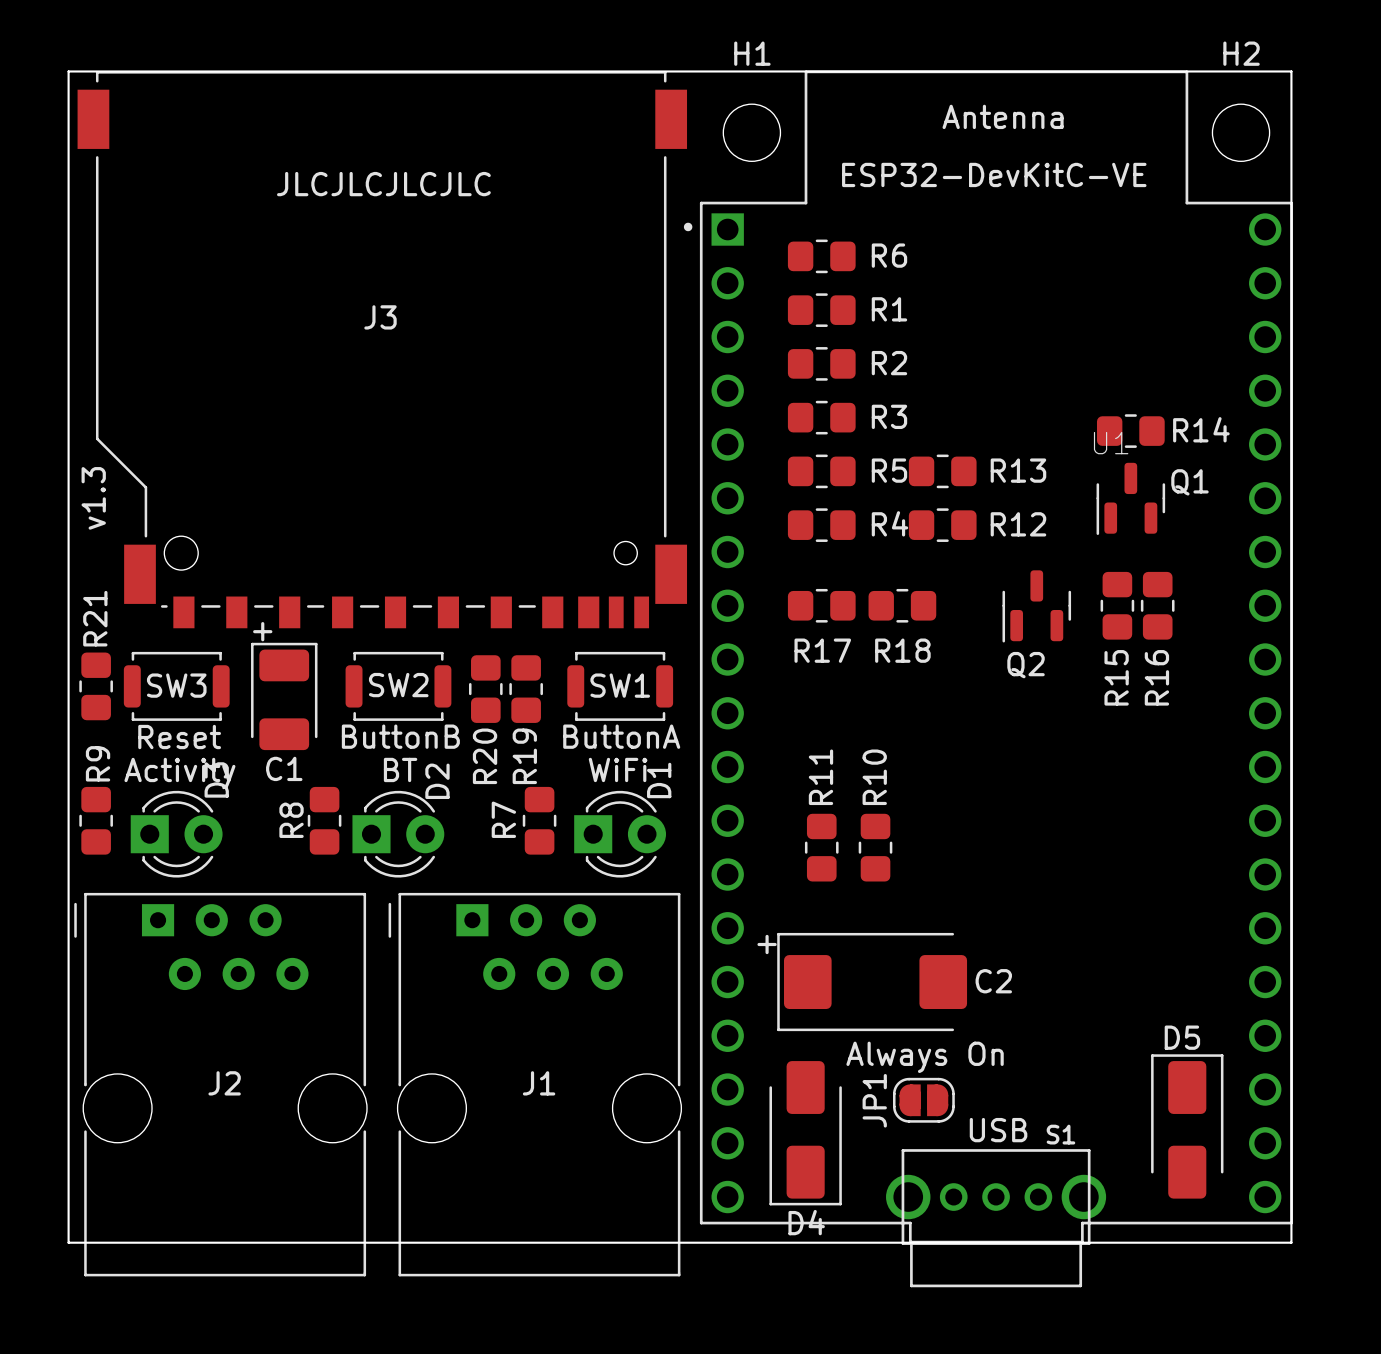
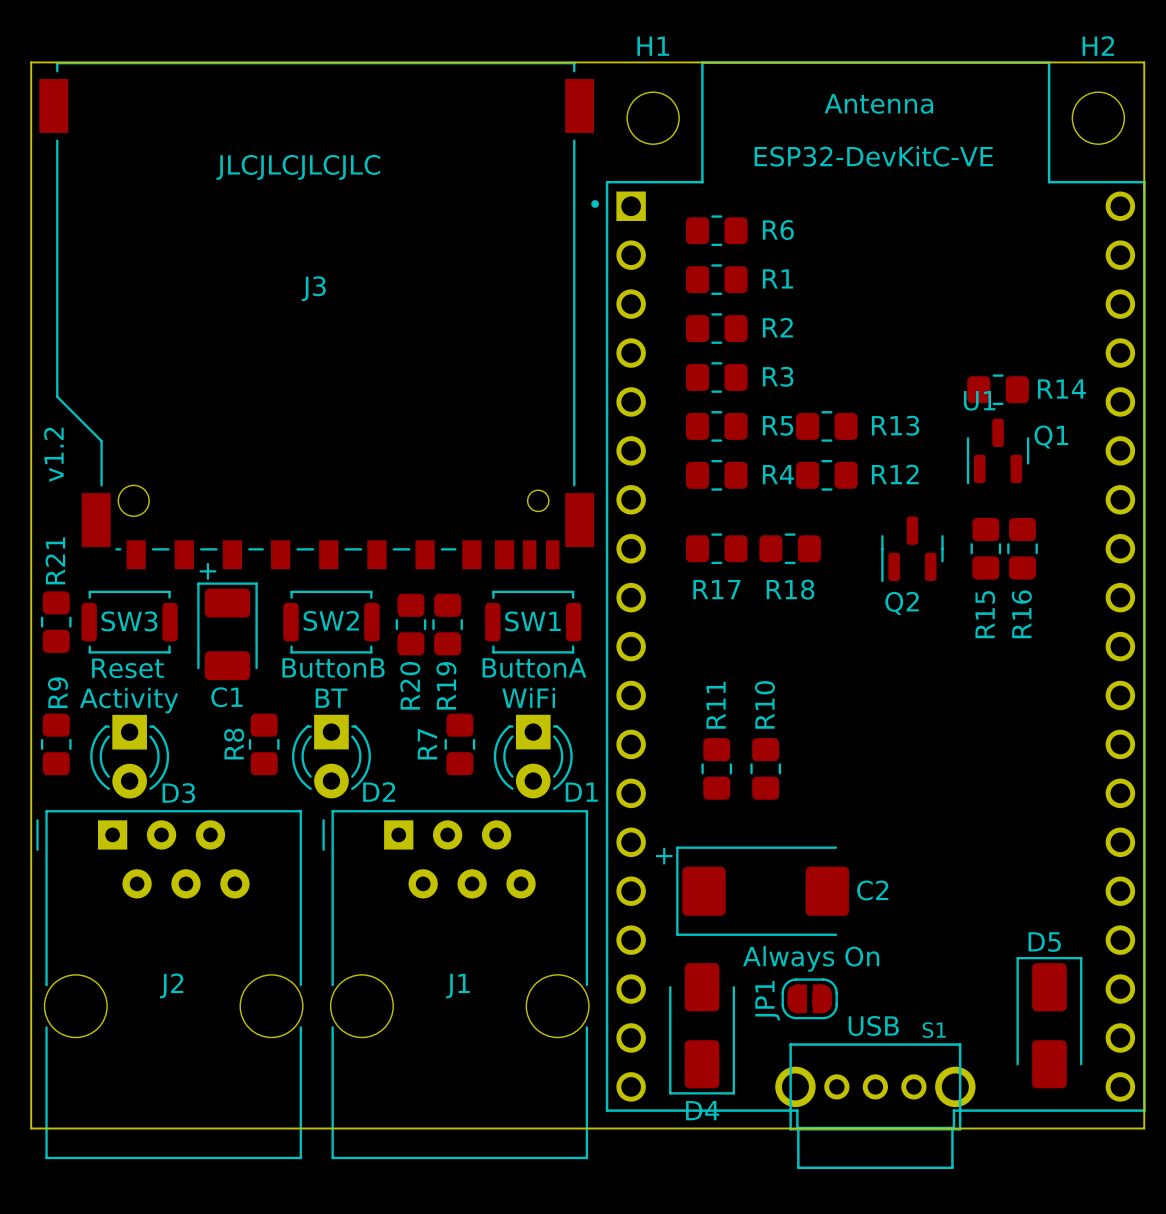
text: v1.3 (93, 498) -> v1.2 (53, 454)
D1 name position: D1 (659, 780) -> D1 (581, 792)
D1 footprint: [574, 790, 667, 878] -> [493, 714, 573, 799]
D3 rotation: 0° (176, 834) -> 90° clockwise (129, 756)
D2 rotation: 0° (398, 834) -> 90° clockwise (331, 756)

